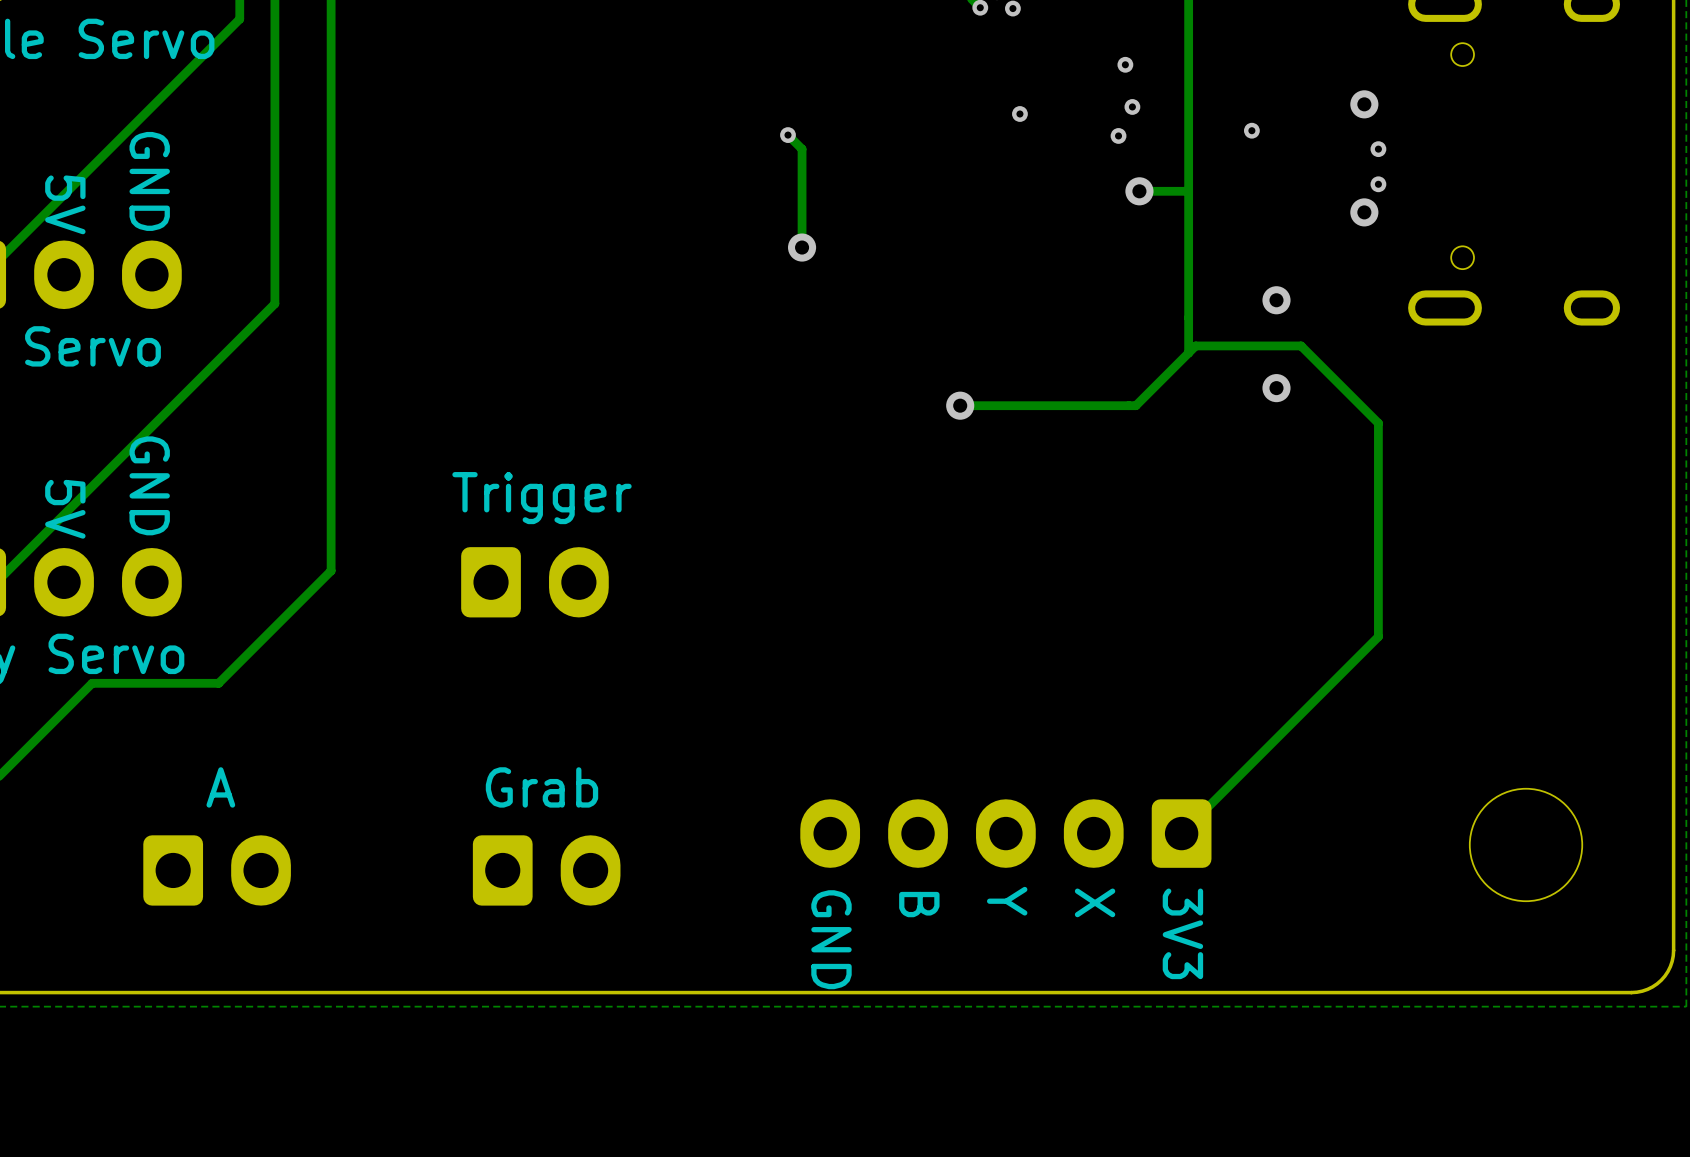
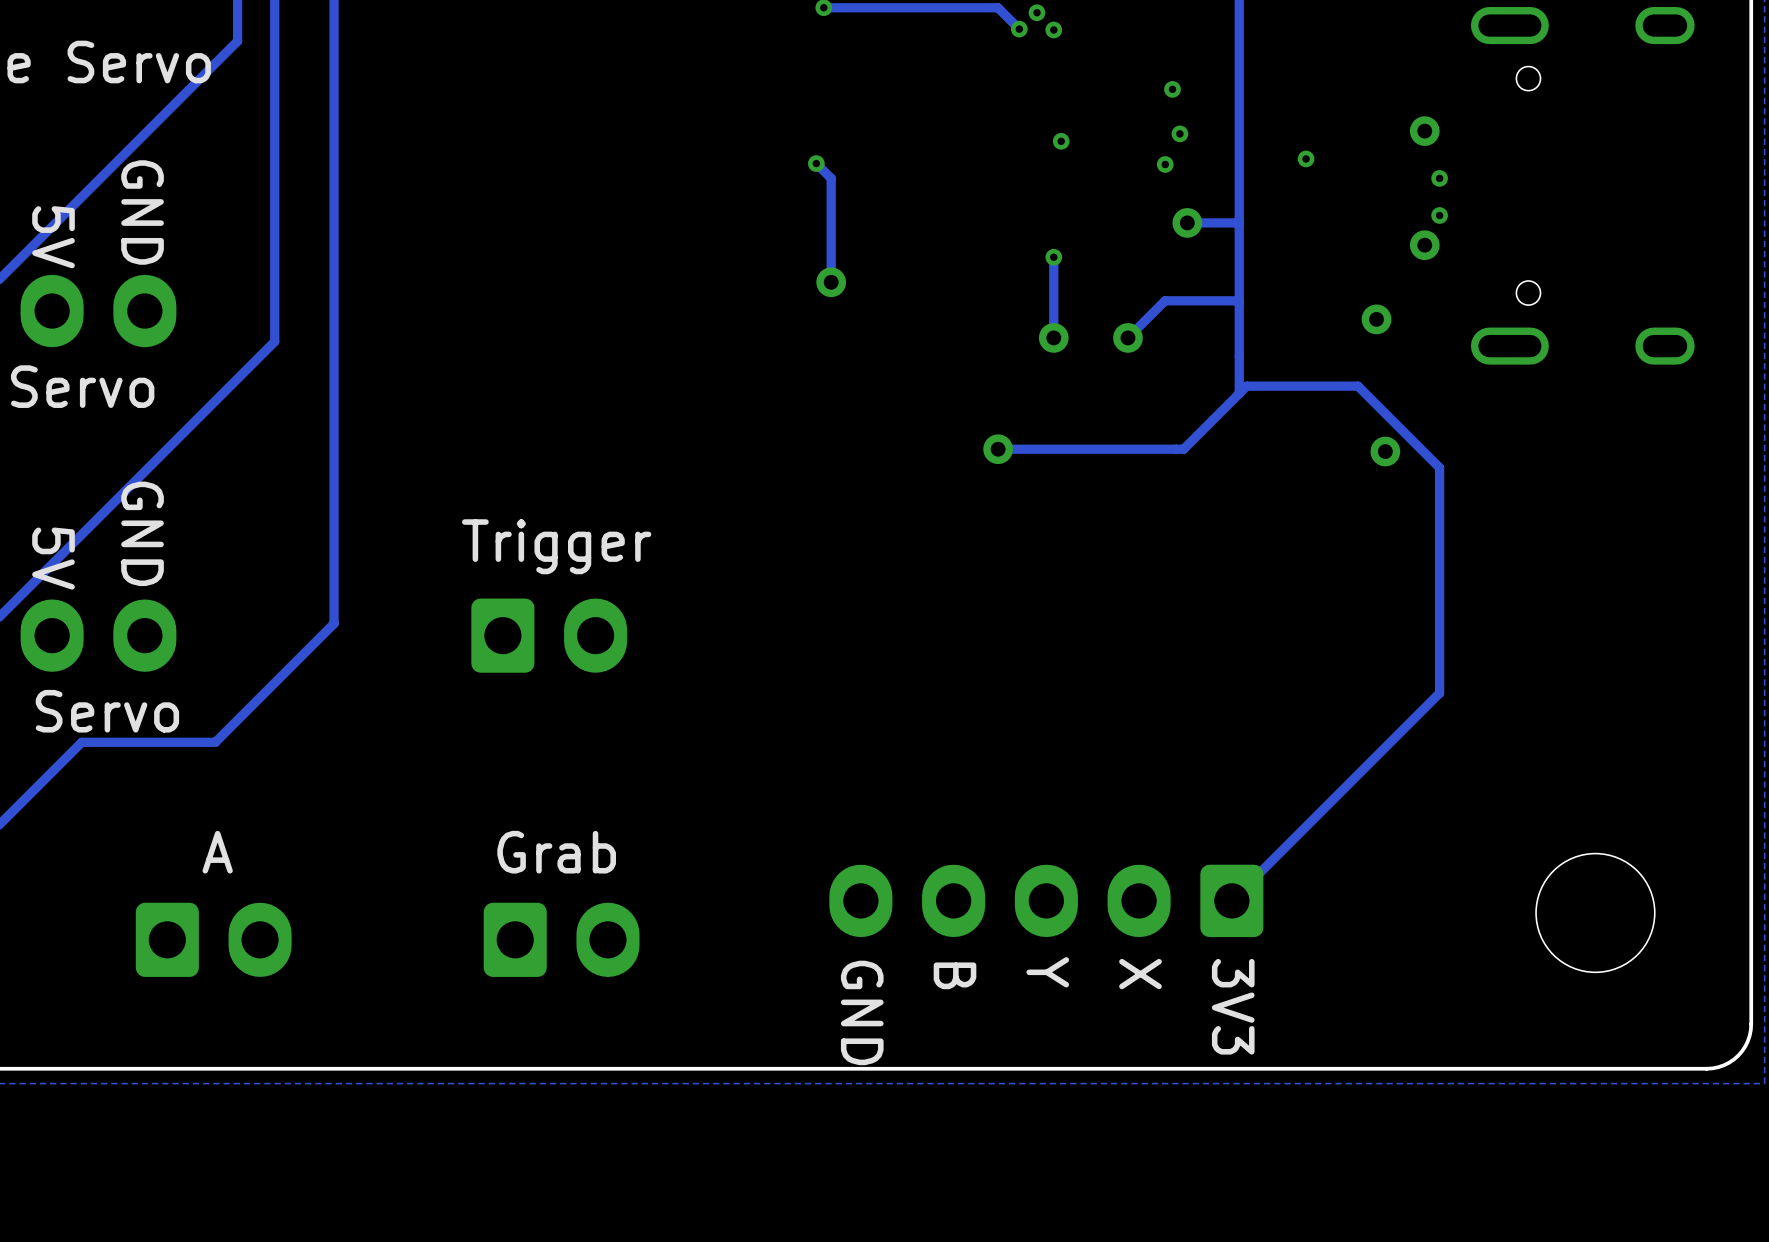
track: none -> (1053, 257) (1053, 337)
via: none -> (1053, 257)
track: none -> (1239, 300) (1165, 300) (1127, 337)
via: none -> (1053, 337)
via: none -> (1127, 337)
via position: (1276, 300) -> (1376, 319)
via position: (1276, 388) -> (1385, 451)

